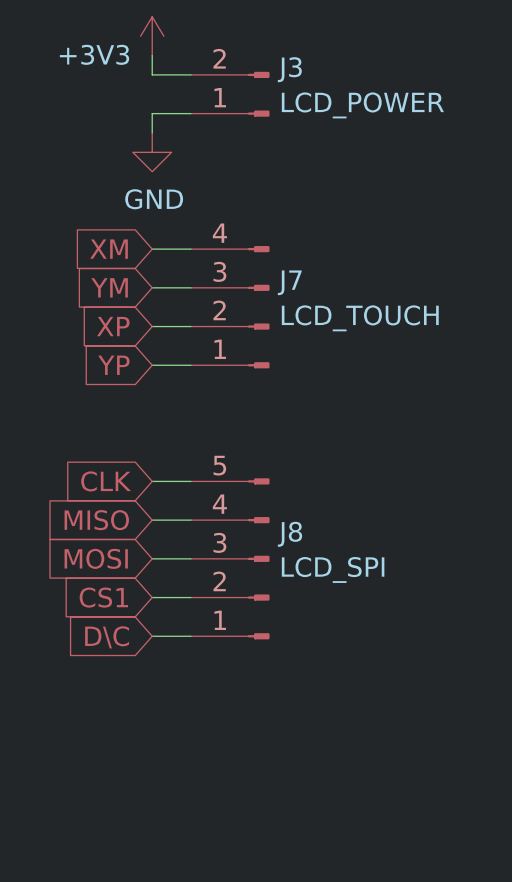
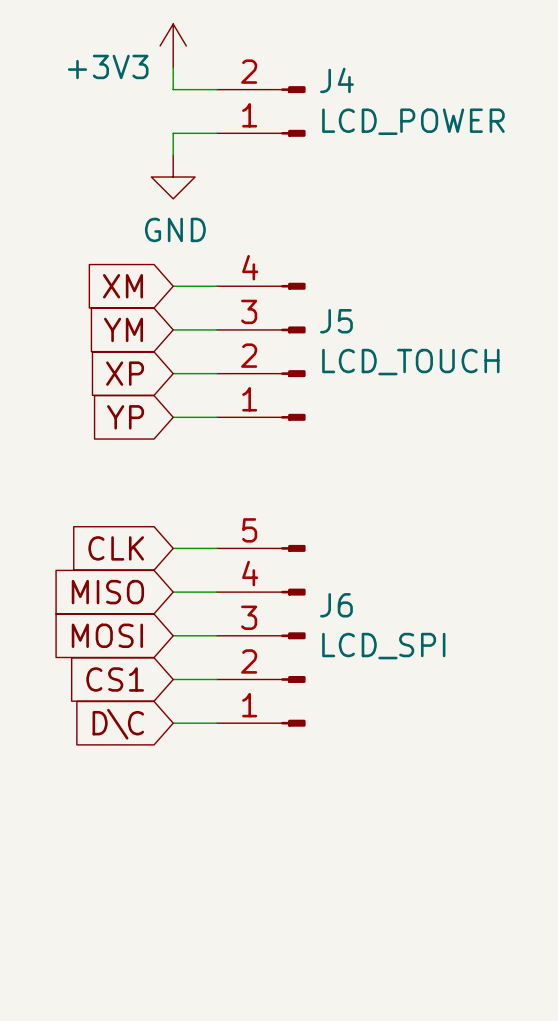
J3 name: J3 (289, 69) -> J4 (336, 80)
J7 name: J7 (289, 282) -> J5 (336, 321)
J8 name: J8 (289, 534) -> J6 (336, 605)

